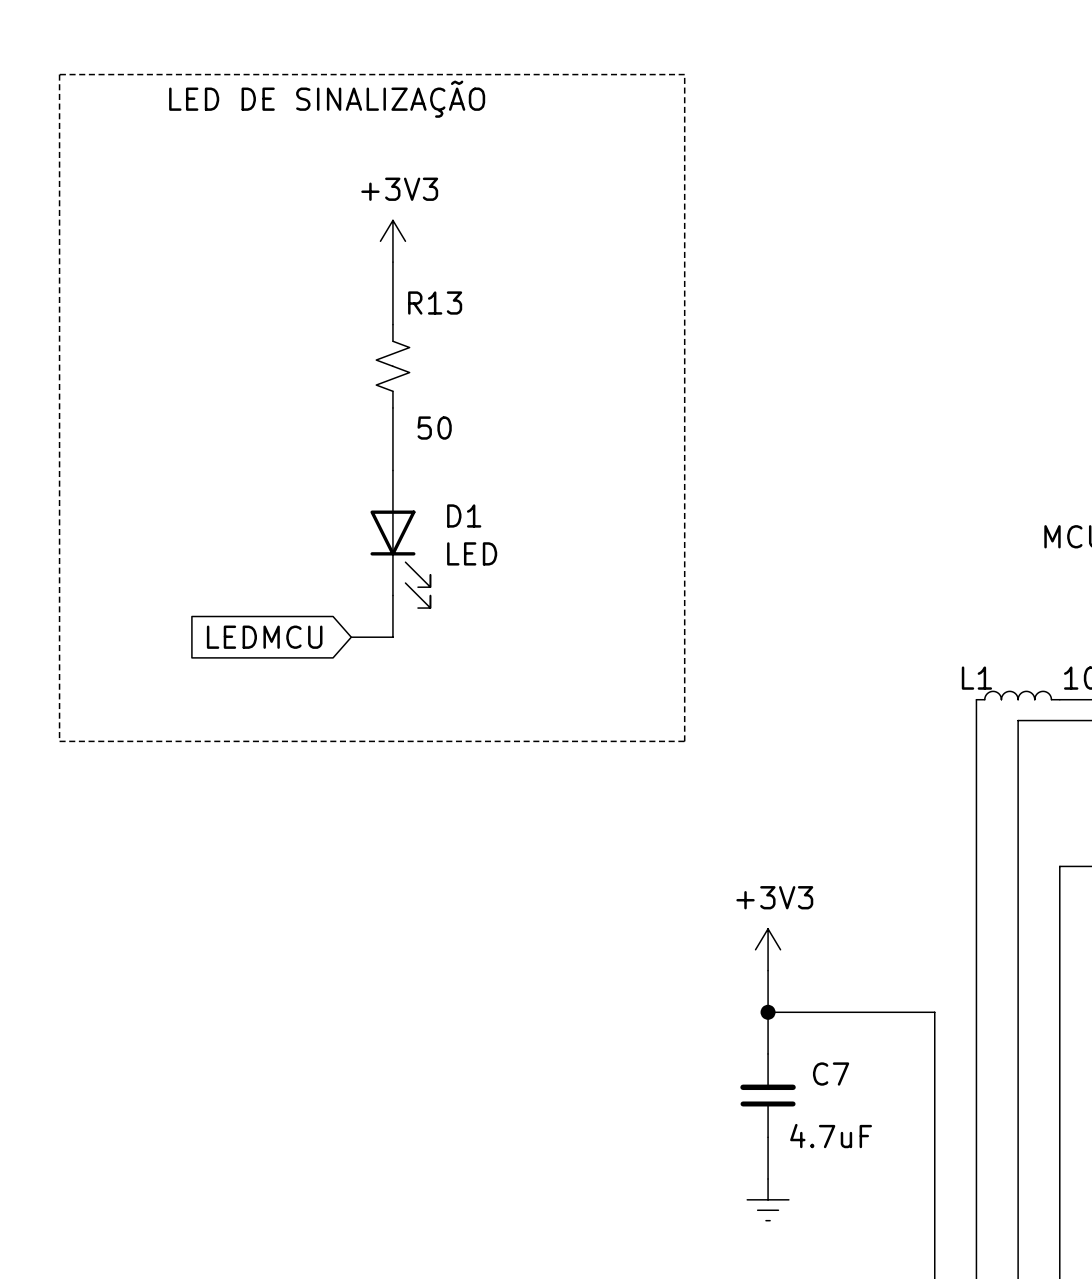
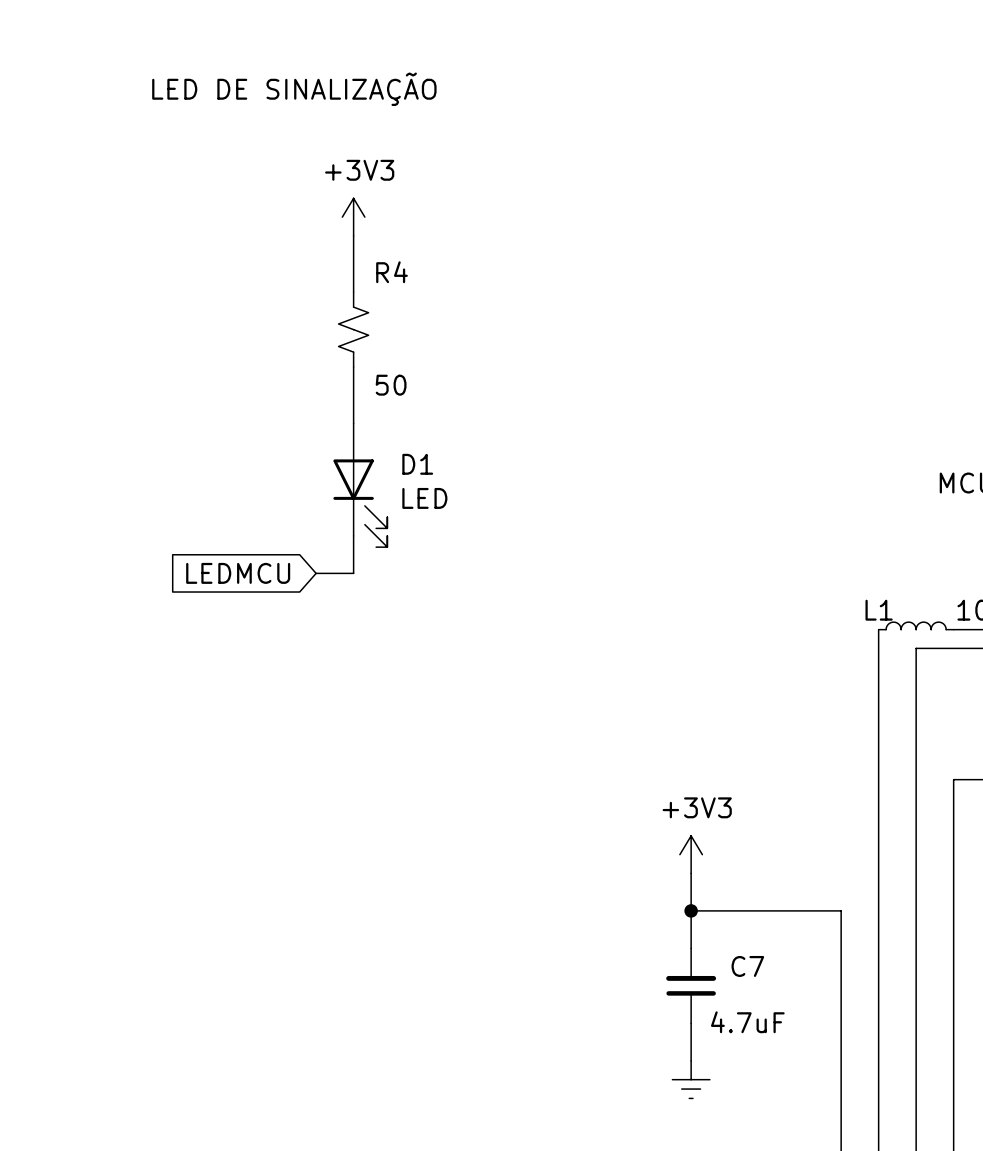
line: (59, 74) (59, 741) (684, 741) (684, 74) (59, 74) -> none
R13 name: R13 (435, 303) -> R4 (392, 272)

